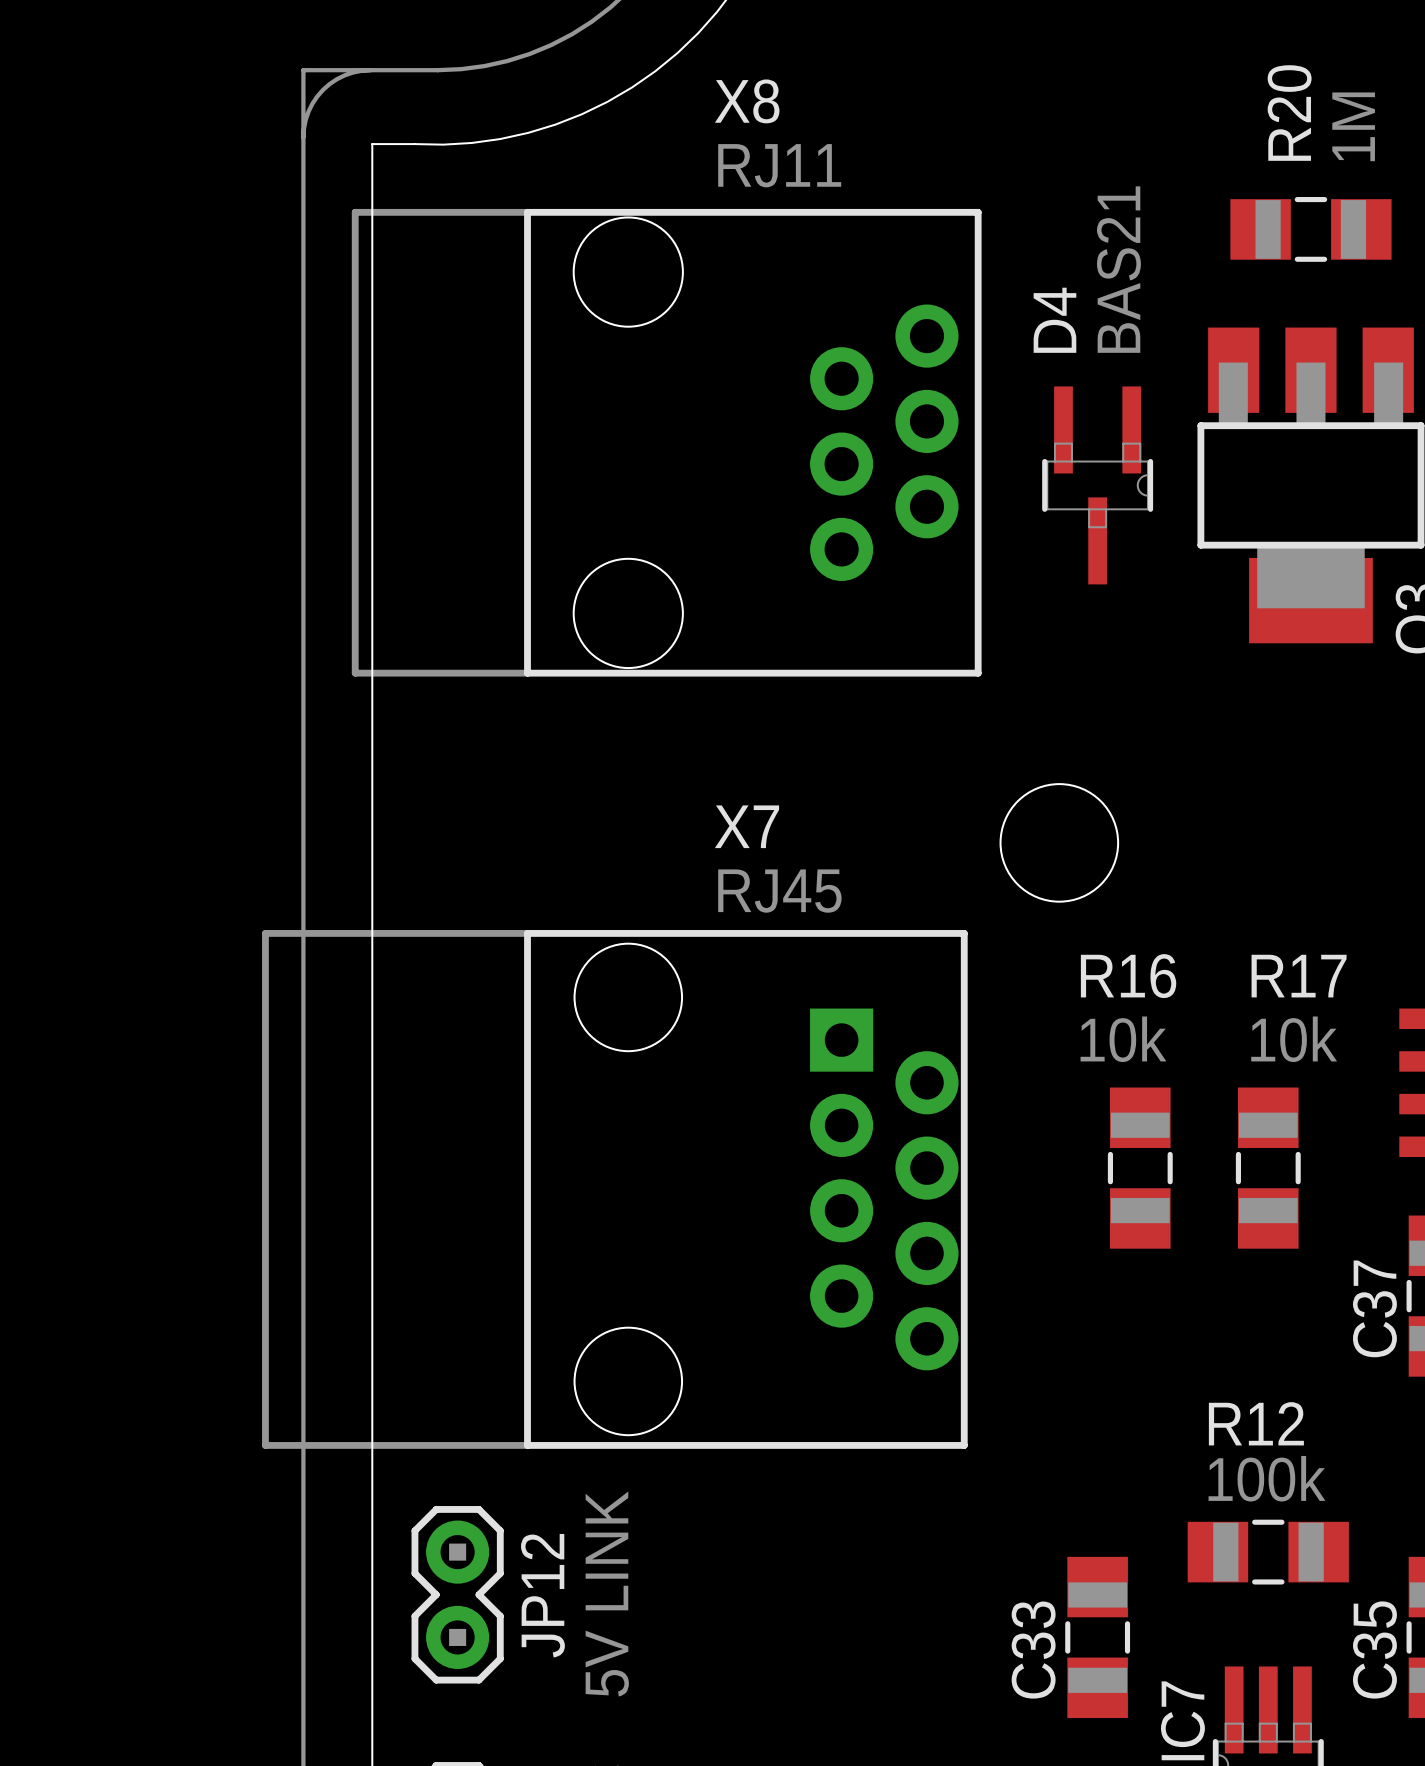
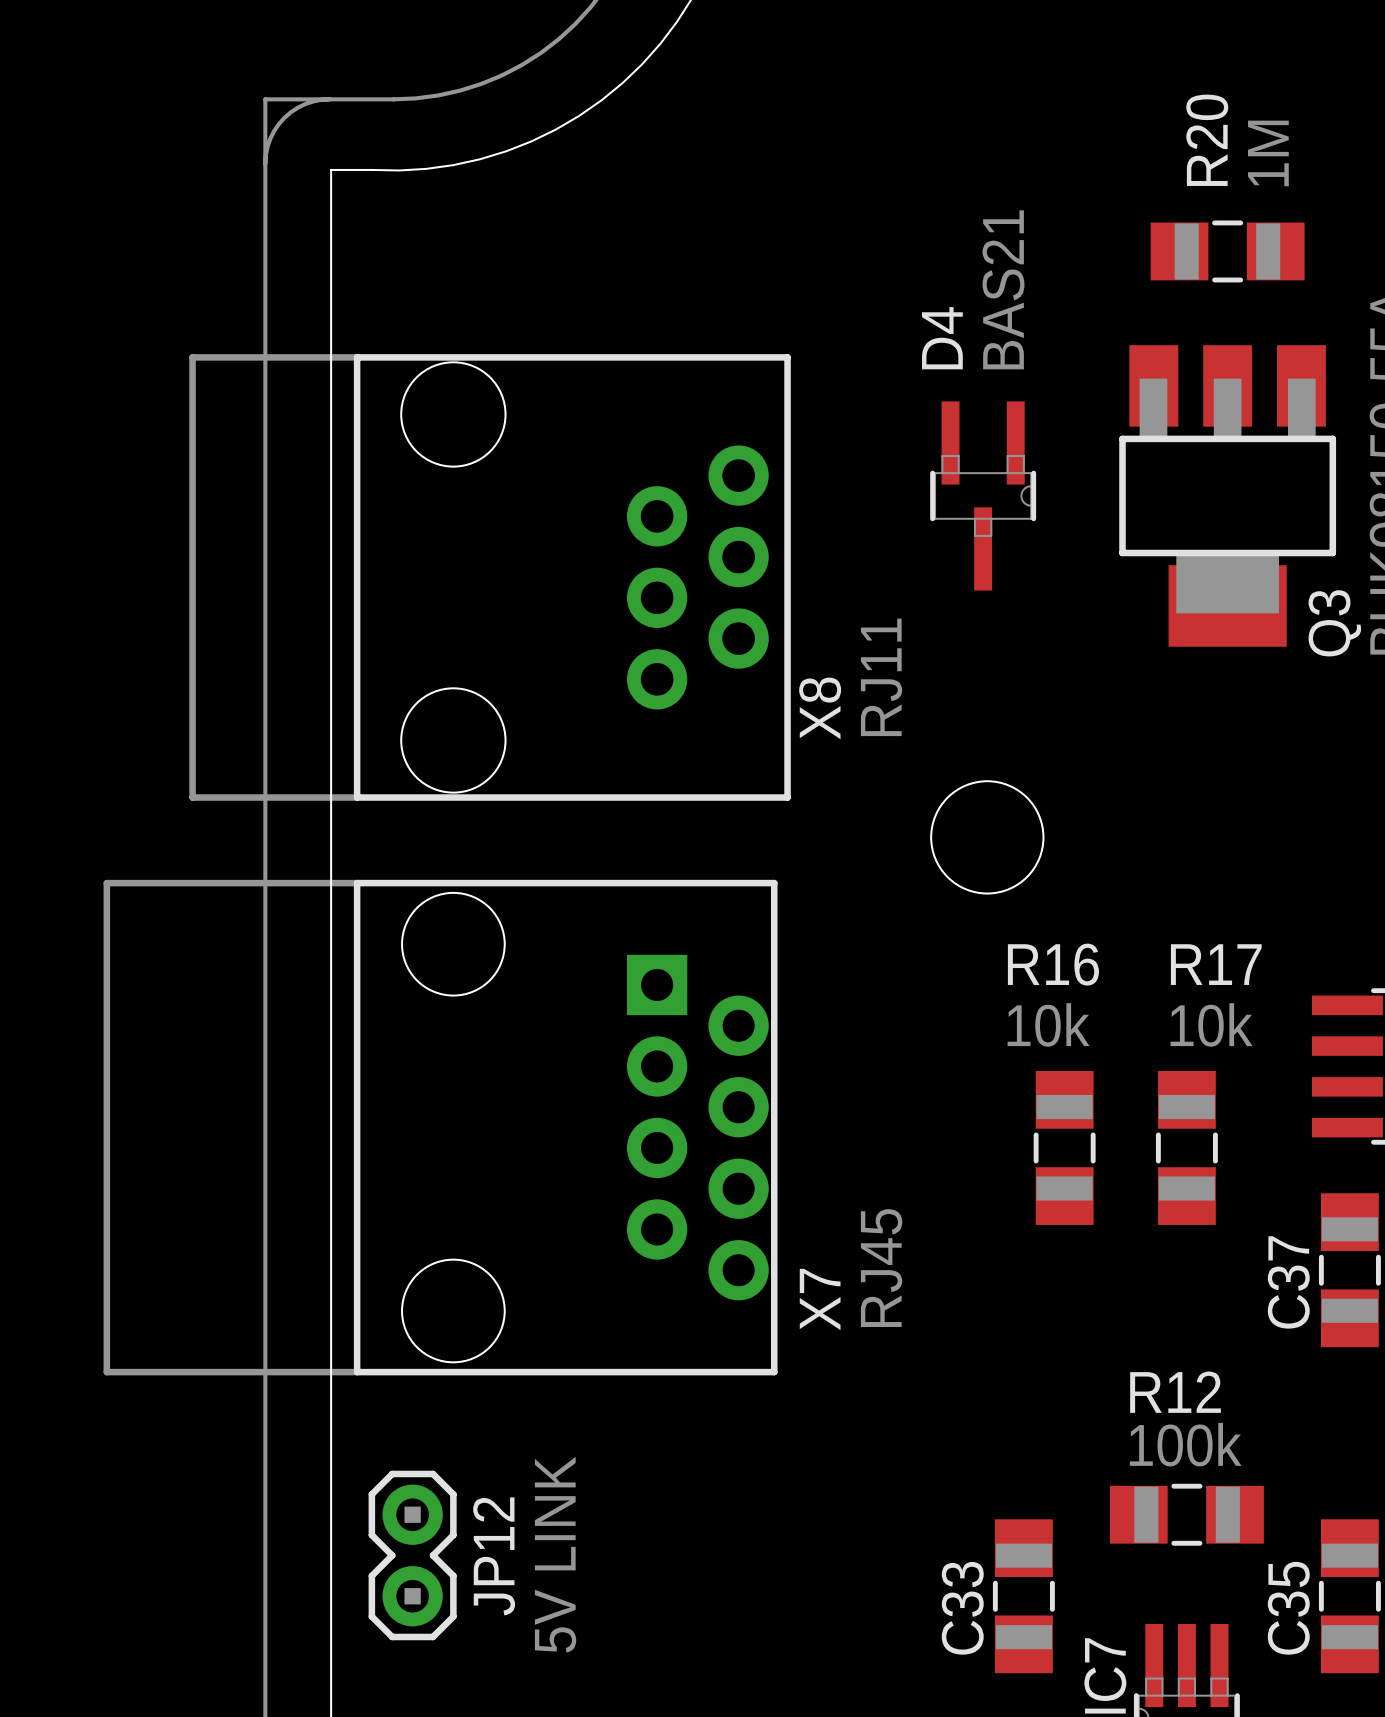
X8 name rotation: 0° (747, 101) -> 90° counterclockwise (820, 708)
X8 name position: X8 (747, 101) -> X8 (820, 708)
X8 value rotation: 0° (779, 165) -> 90° counterclockwise (881, 677)
X8 value position: RJ11 (779, 165) -> RJ11 (881, 677)
X8 position: (666, 442) -> (490, 577)
D4 position: (1097, 485) -> (983, 495)
X7 name rotation: 0° (746, 826) -> 90° counterclockwise (820, 1299)
X7 name position: X7 (746, 826) -> X7 (820, 1299)
X7 value rotation: 0° (779, 891) -> 90° counterclockwise (881, 1268)
X7 value position: RJ45 (779, 891) -> RJ45 (881, 1268)
X7 position: (614, 1189) -> (440, 1127)

